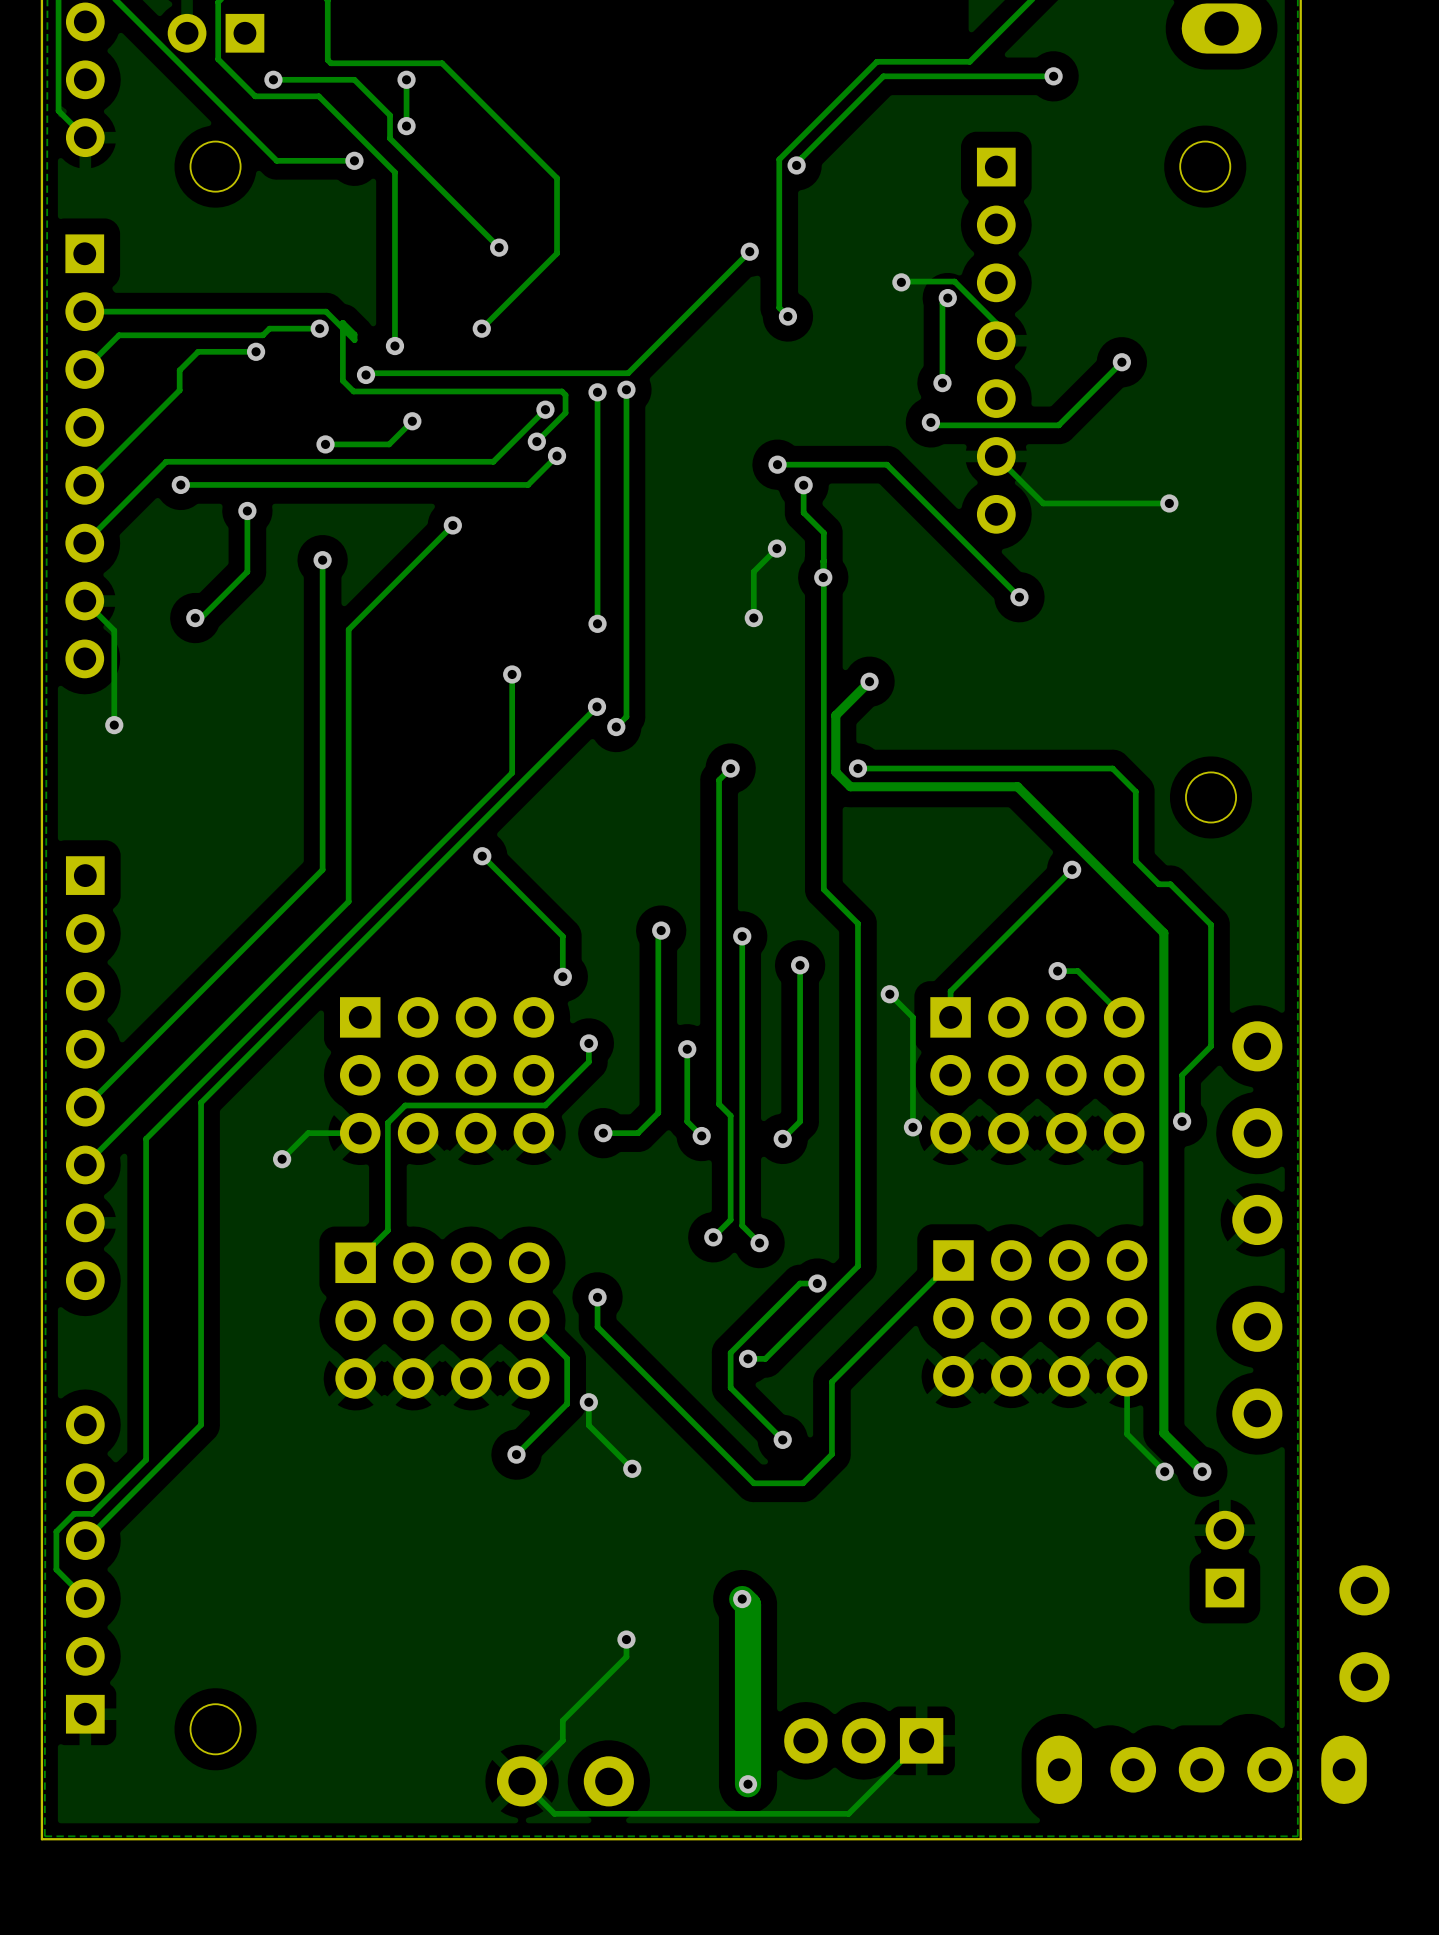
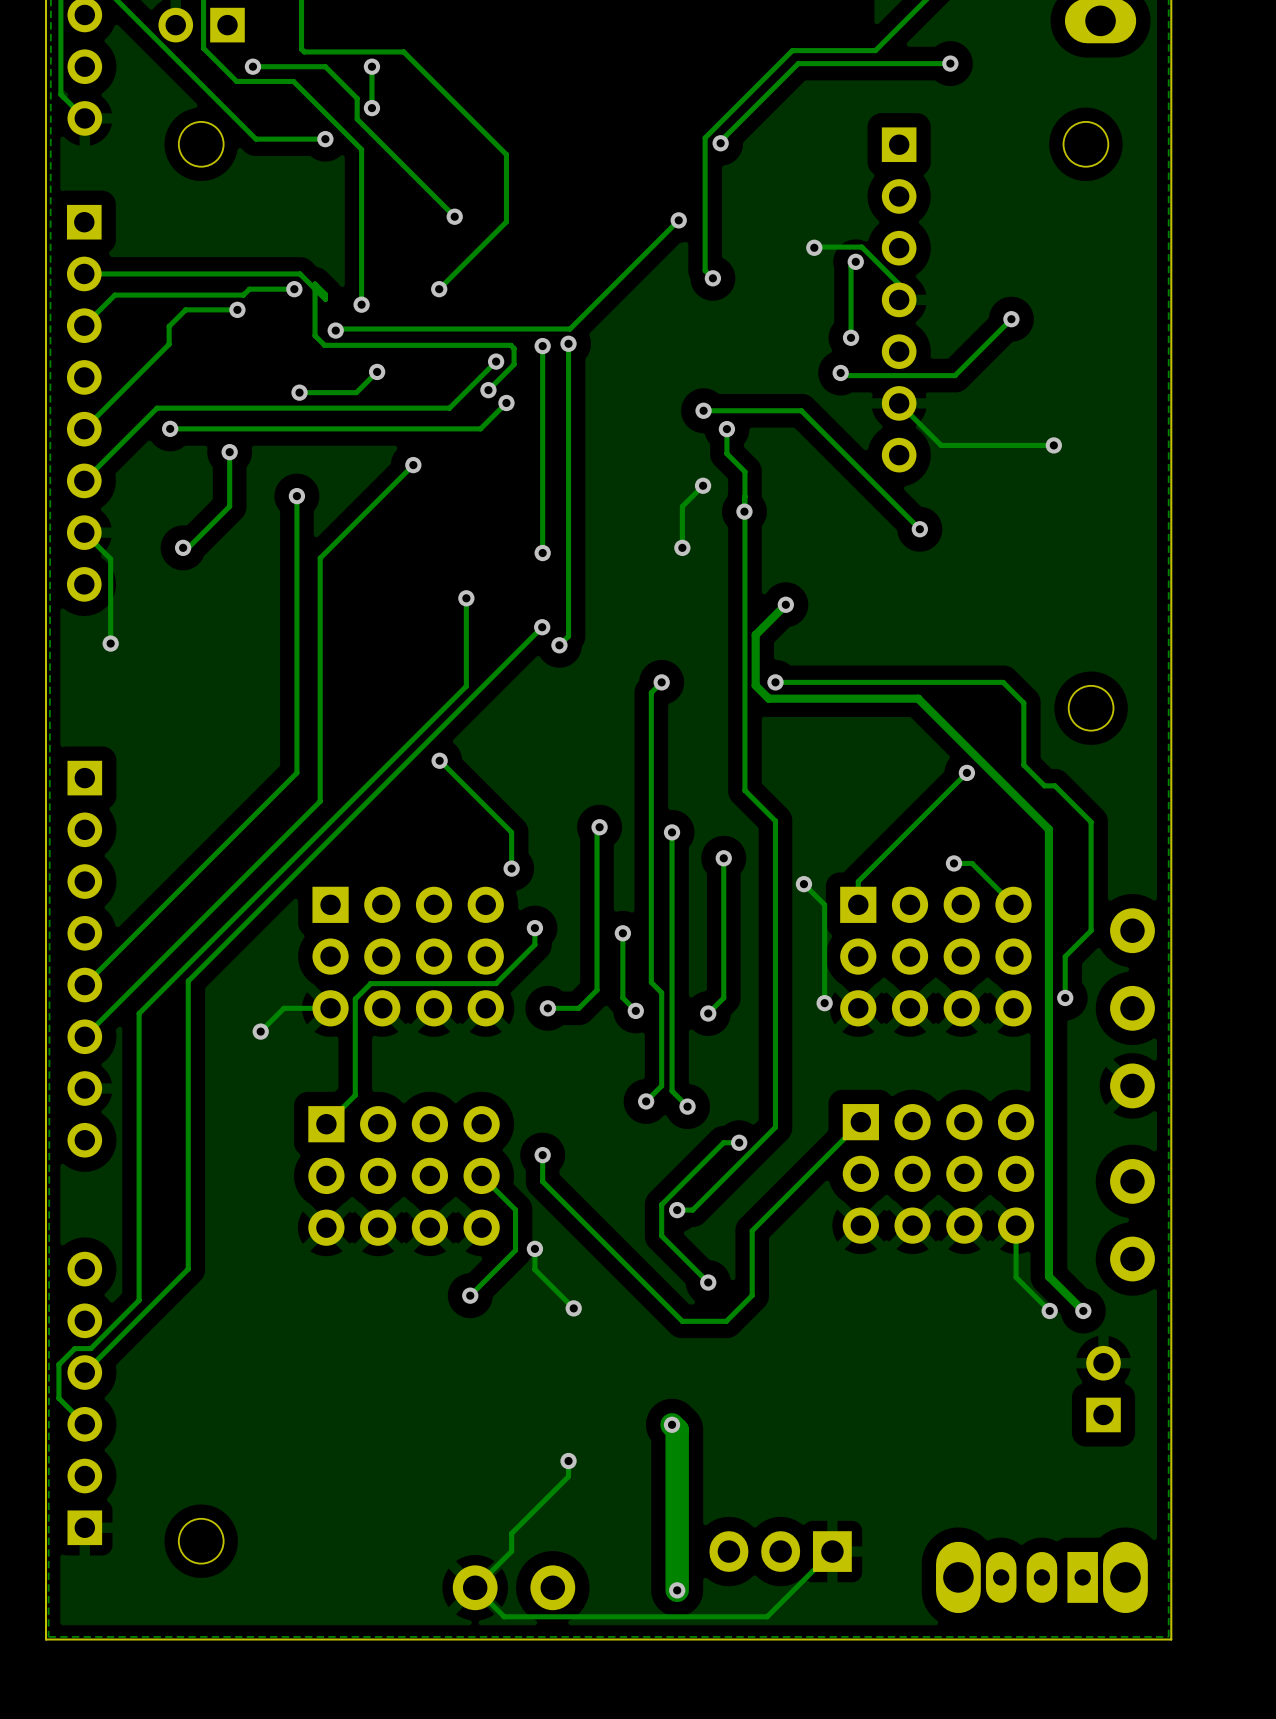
part: (1364, 1633) -> none
part: none -> (1041, 1577)
part: (1201, 1769) -> none

